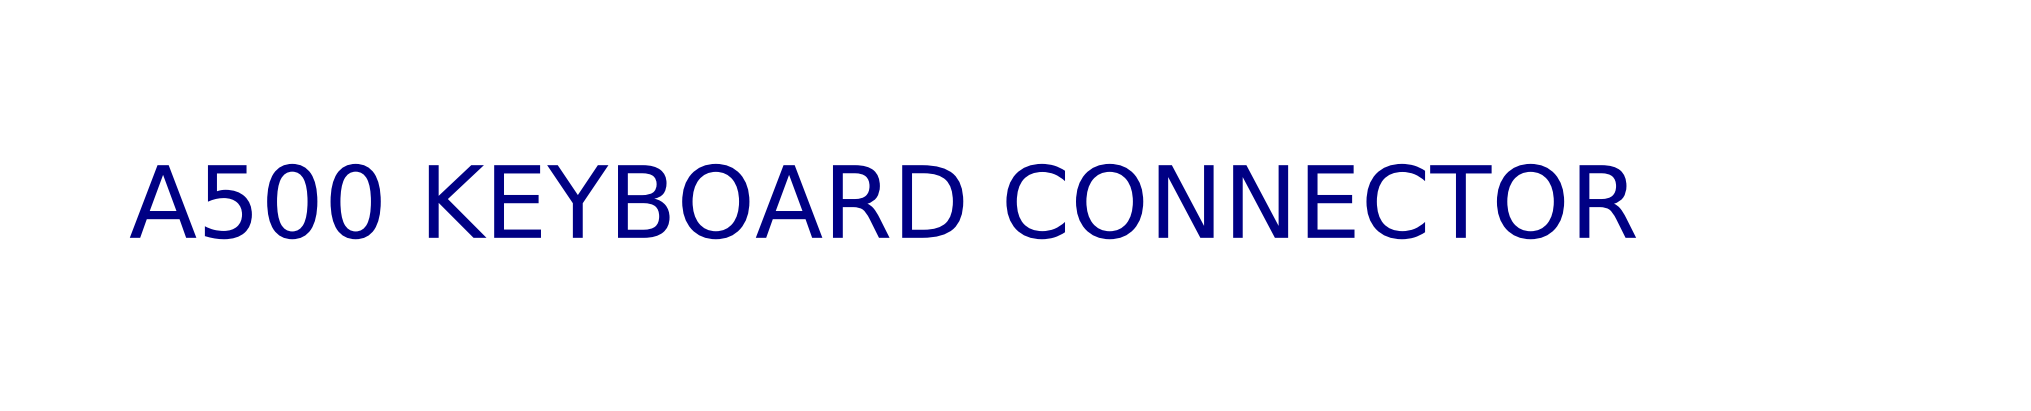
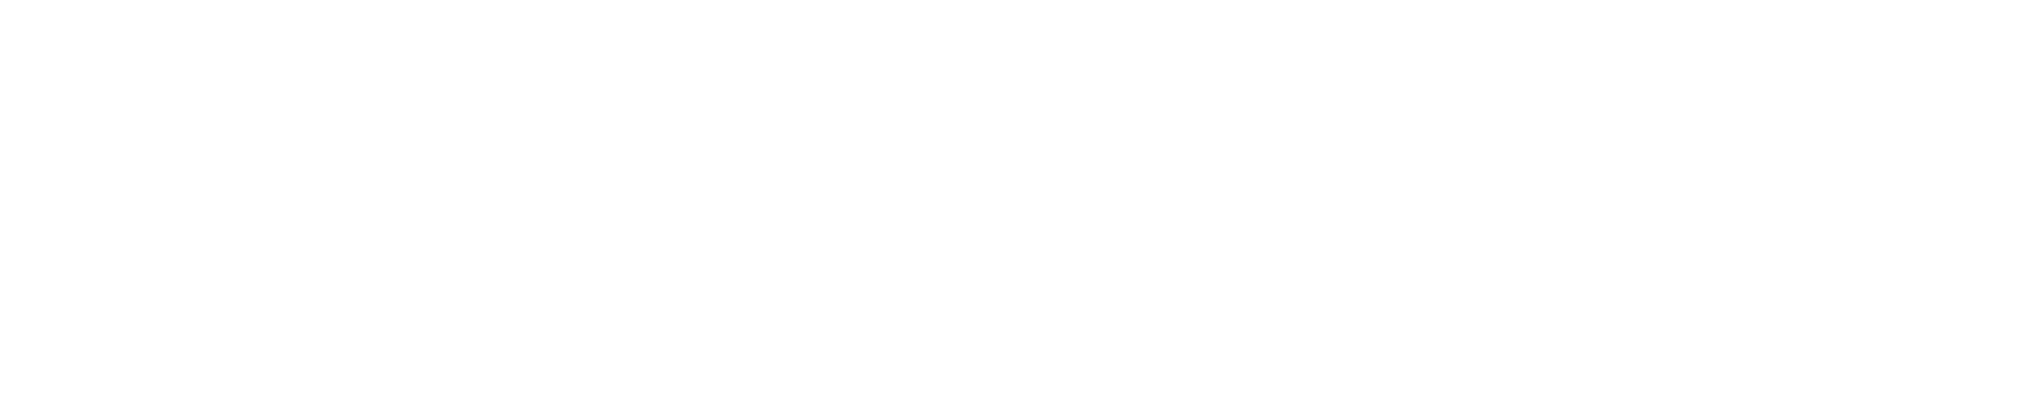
text: A500 KEYBOARD CONNECTOR (882, 201) -> none

